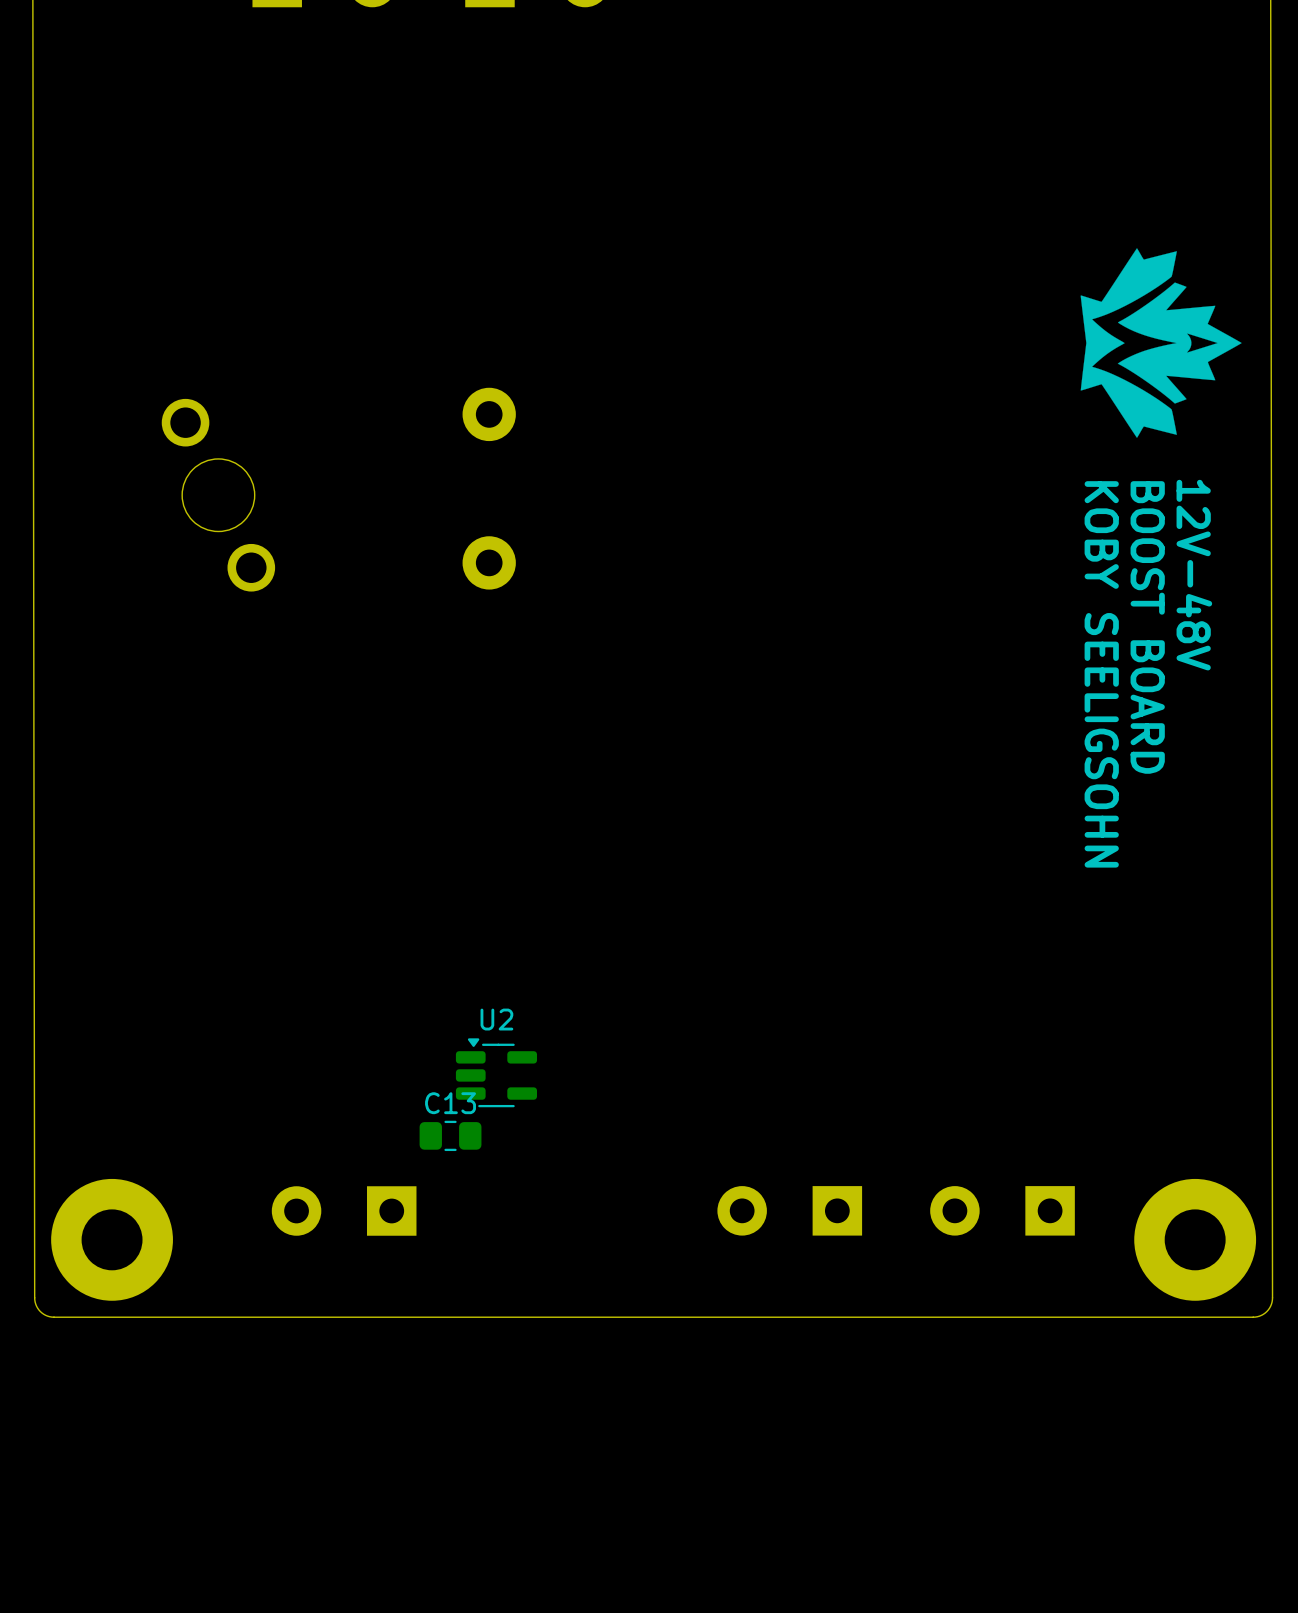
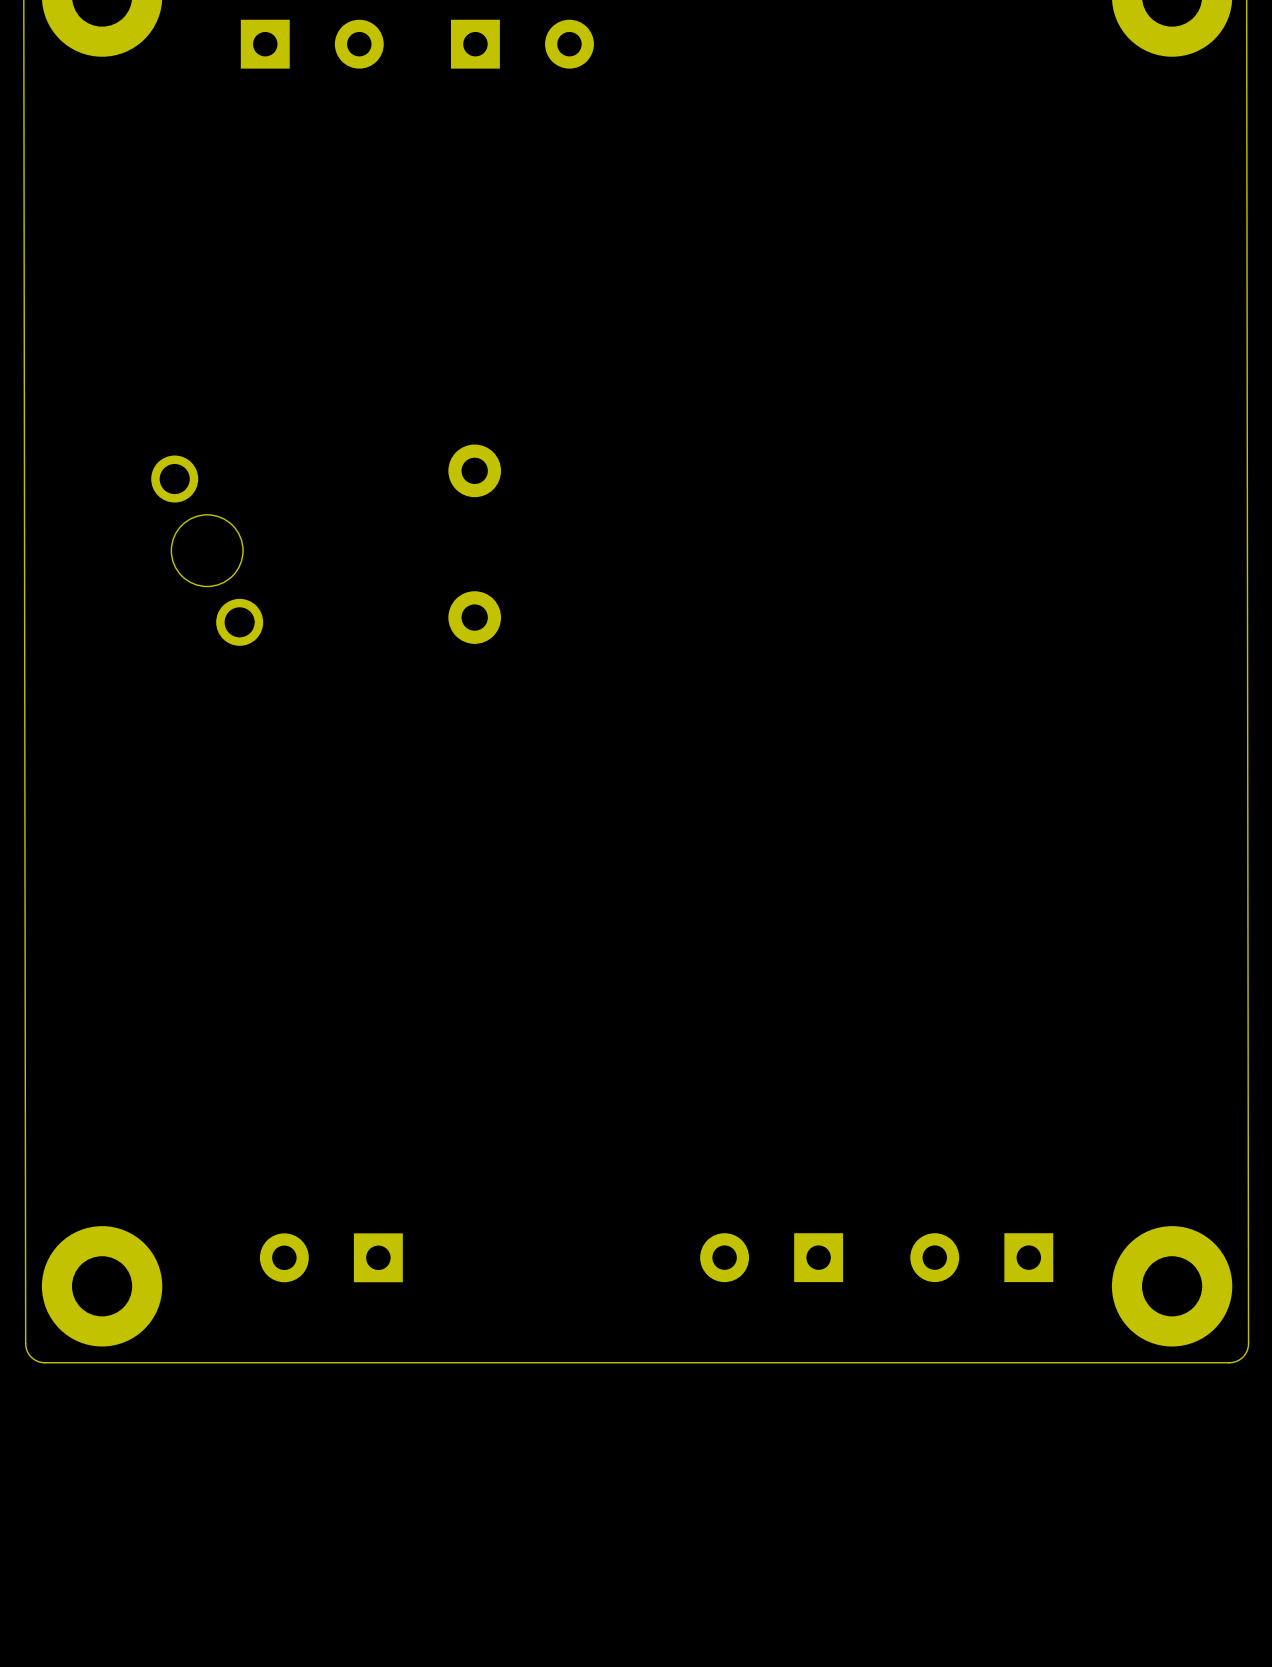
drawing: [1080, 248, 1242, 438] -> none
text: 12V-48V (1194, 575) -> none
text: BOOST BOARD (1147, 627) -> none
text: KOBY SEELIGSOHN (1101, 674) -> none
U2: (496, 1072) -> none
C13: (450, 1135) -> none

